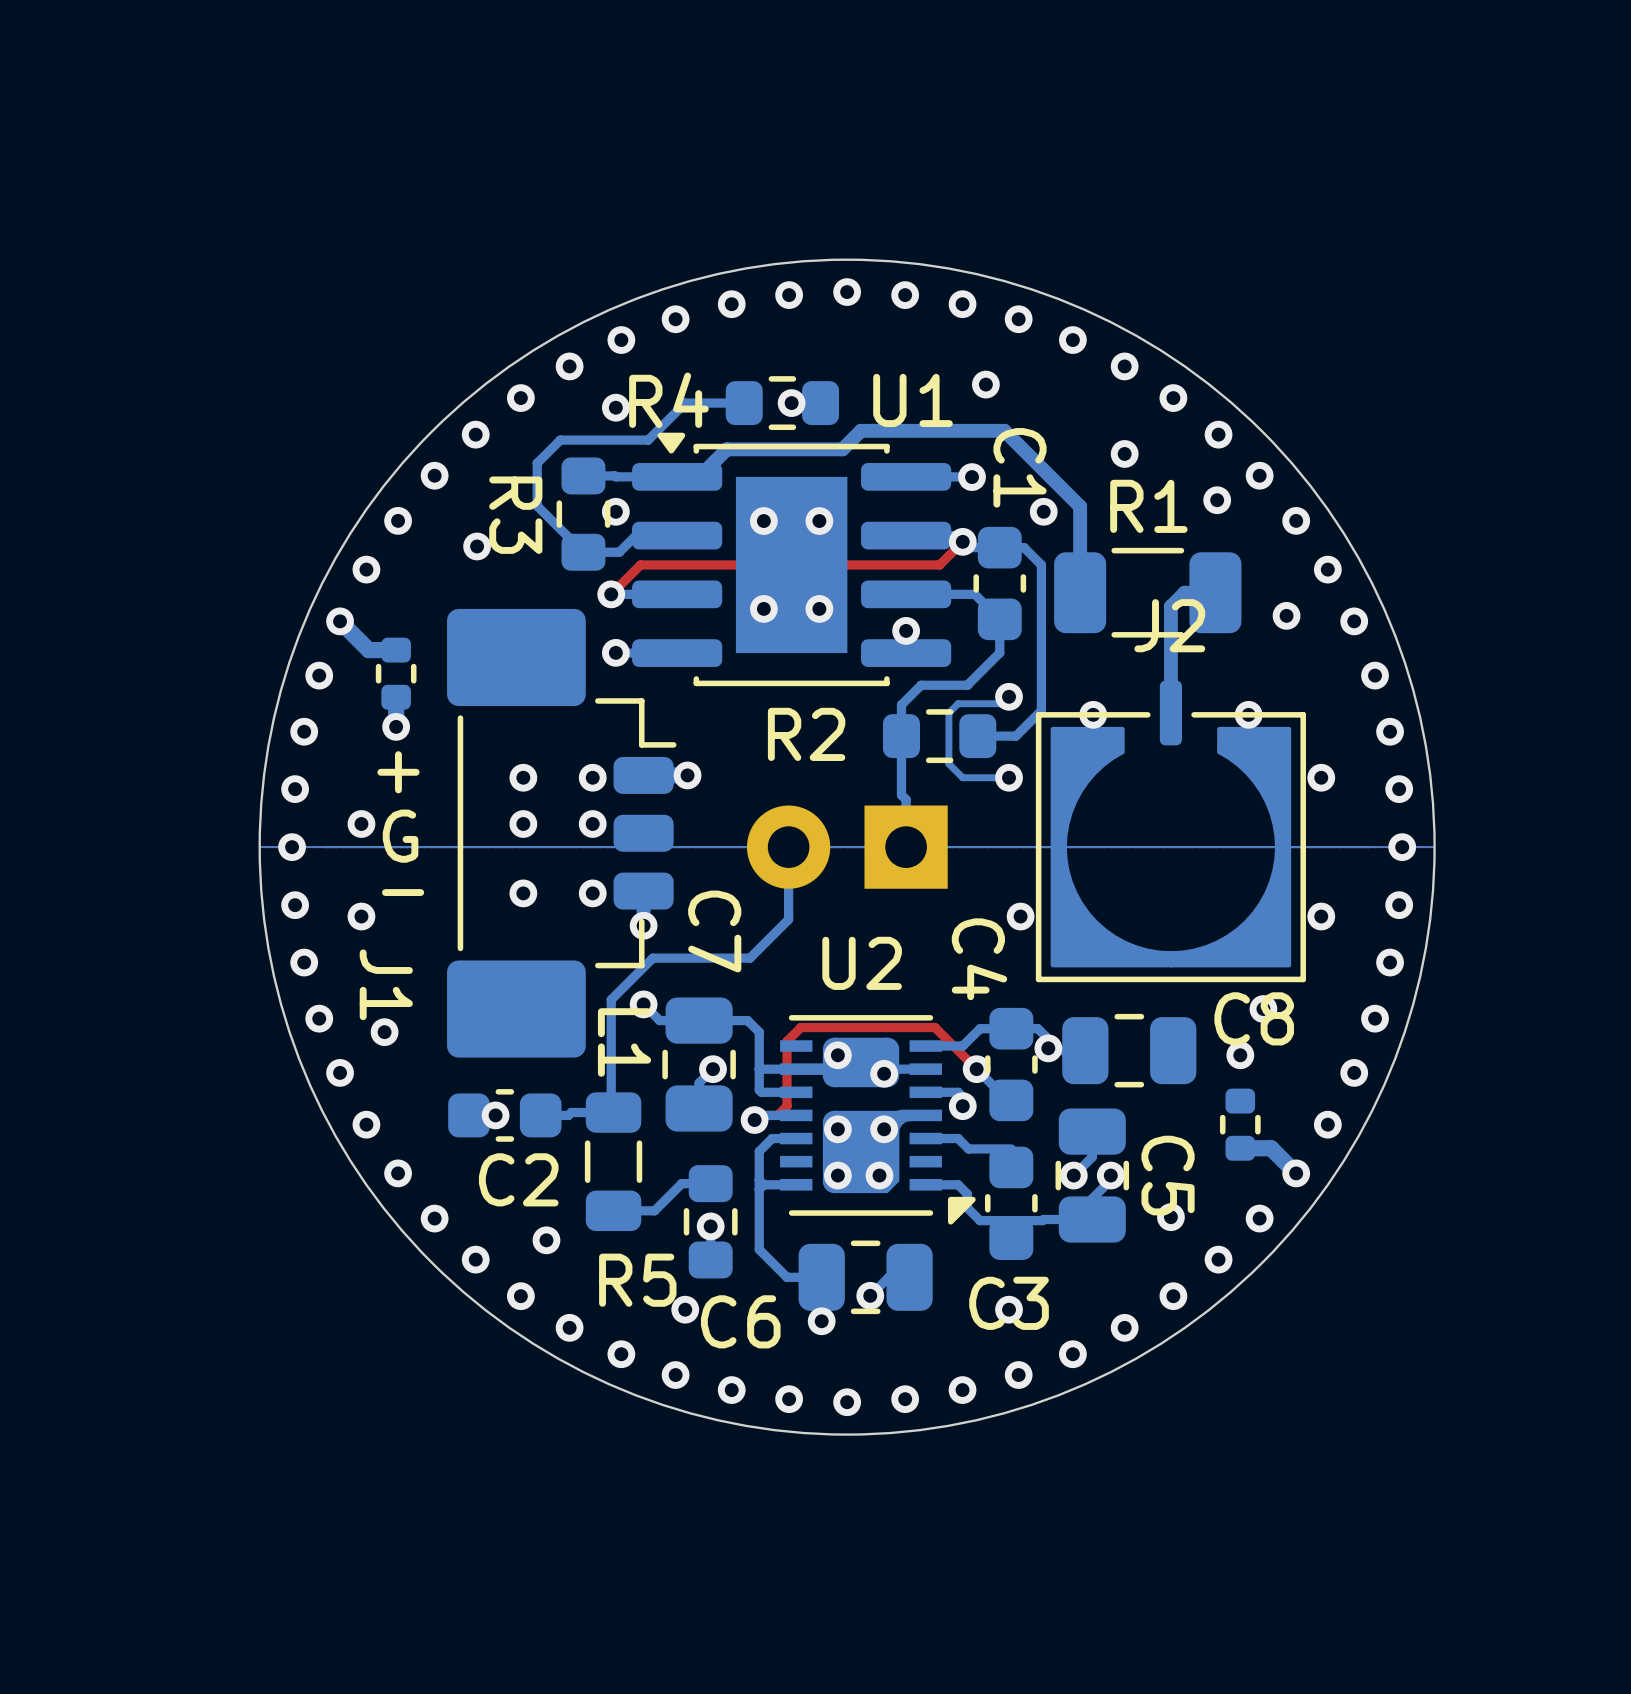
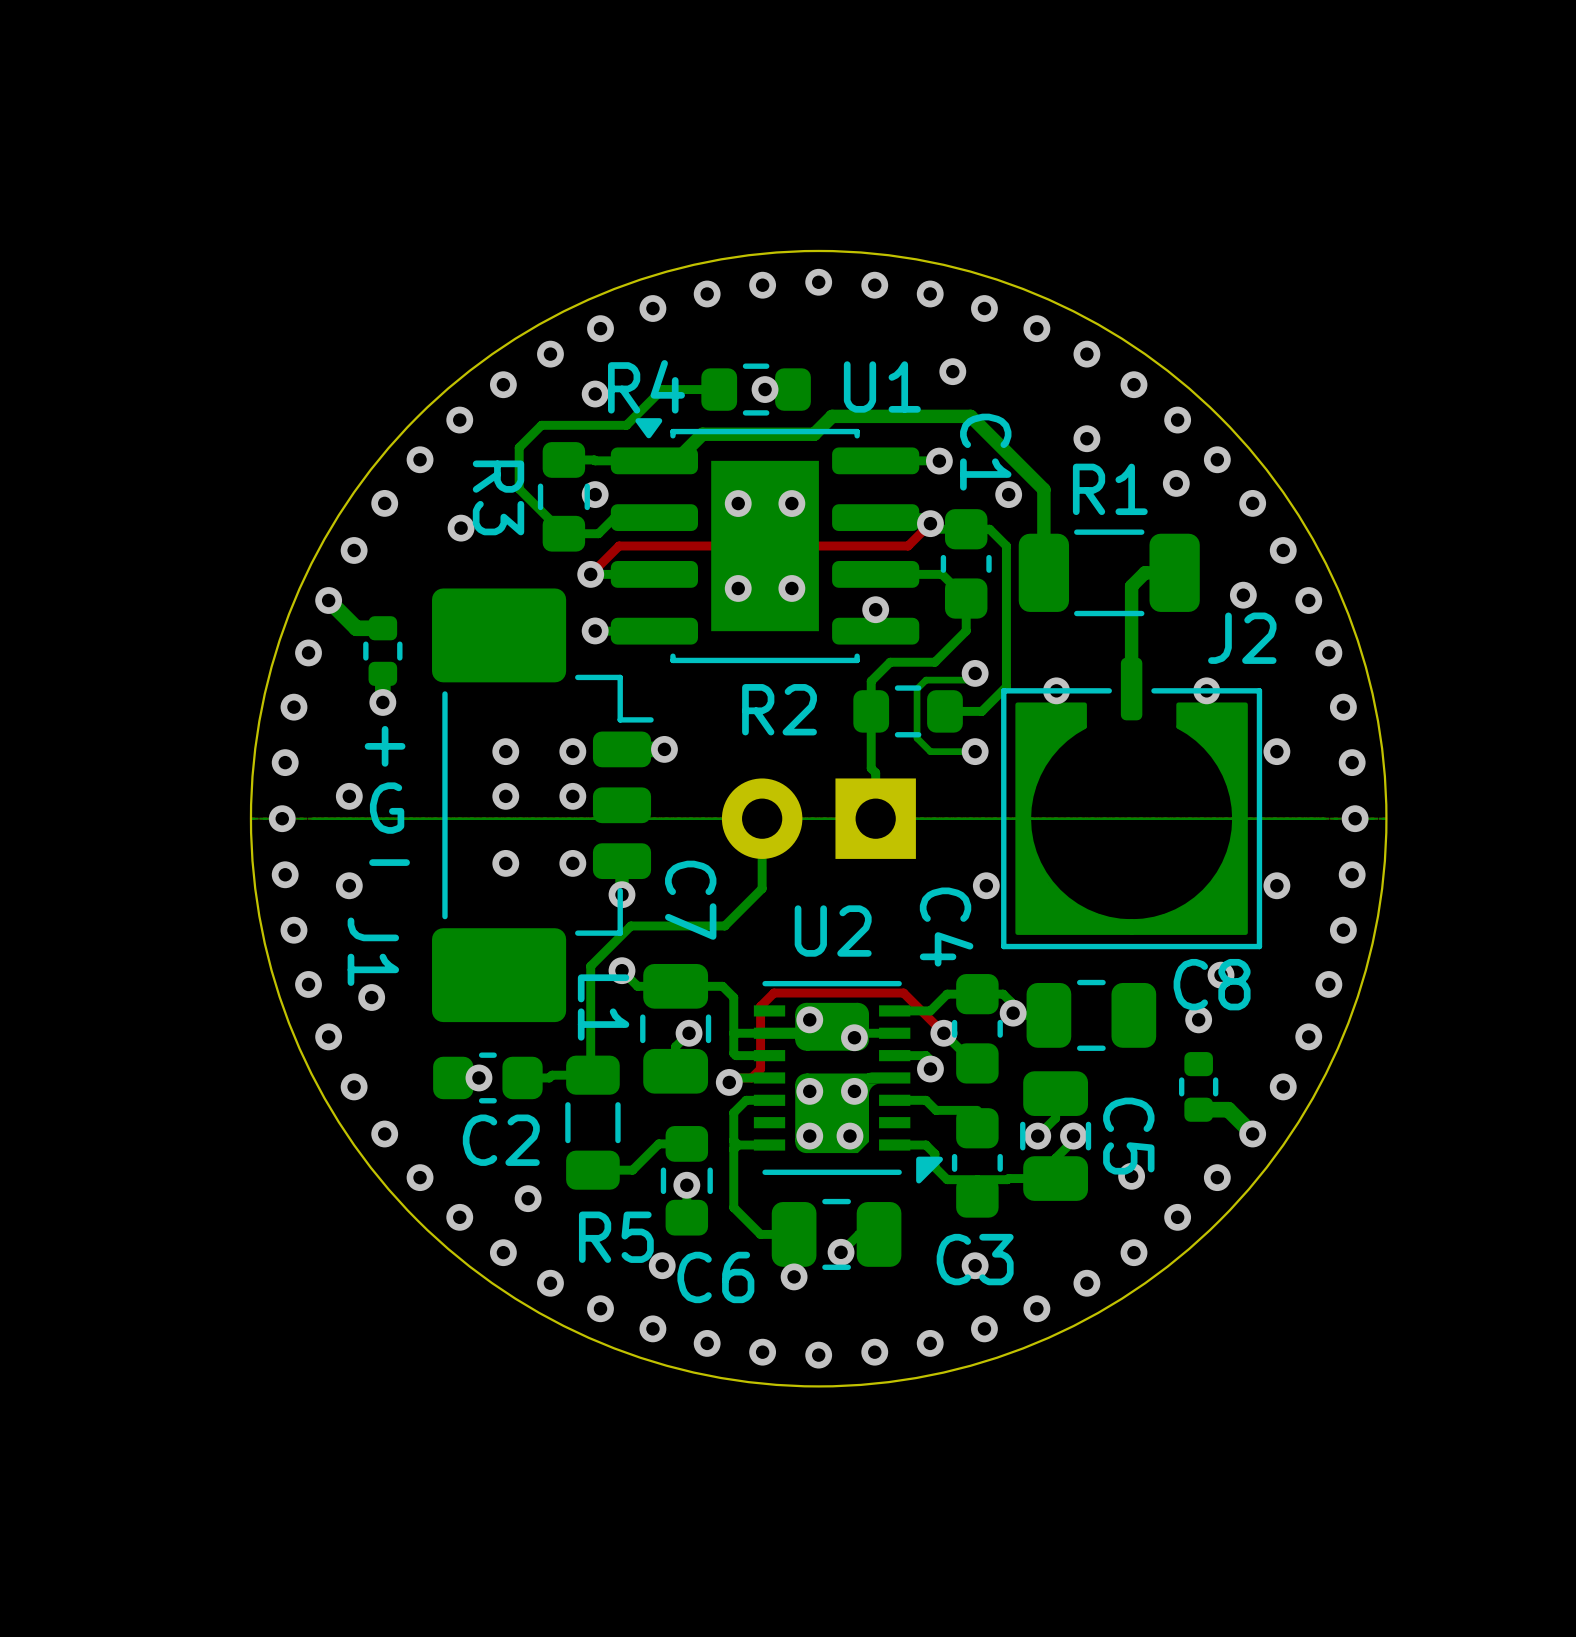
J2 name position: J2 (1169, 625) -> J2 (1242, 638)

